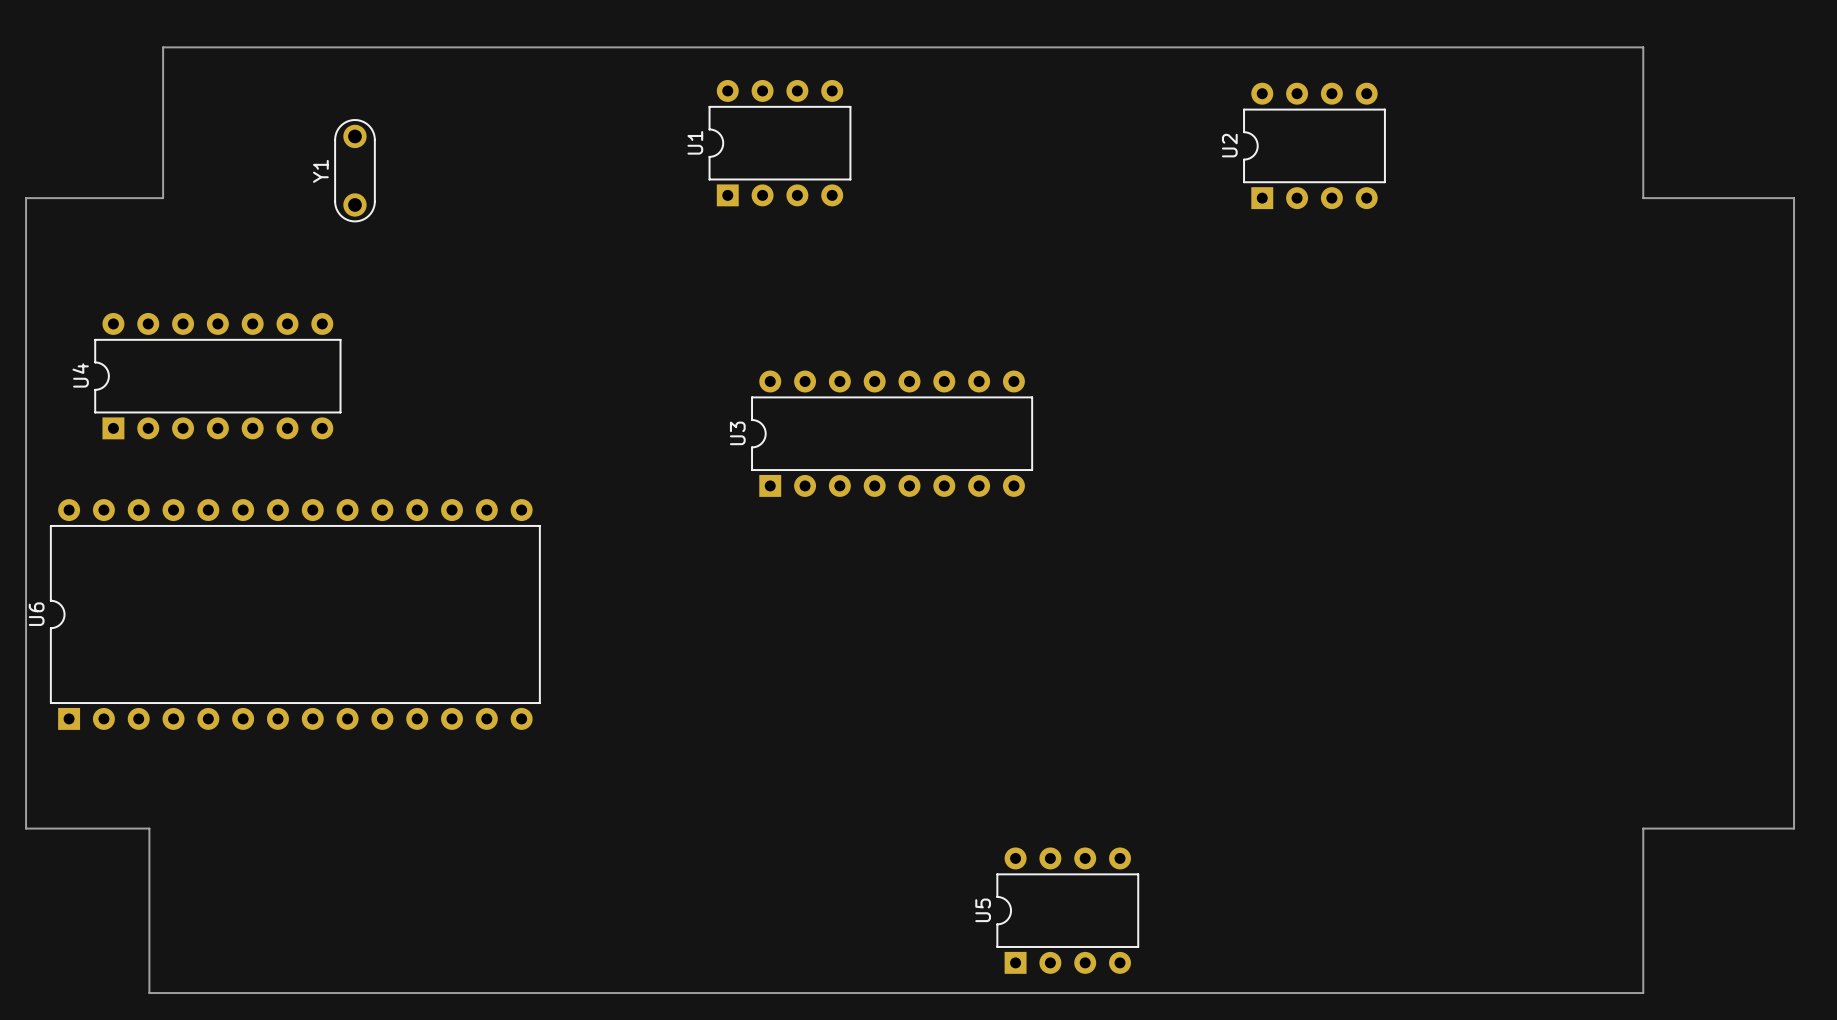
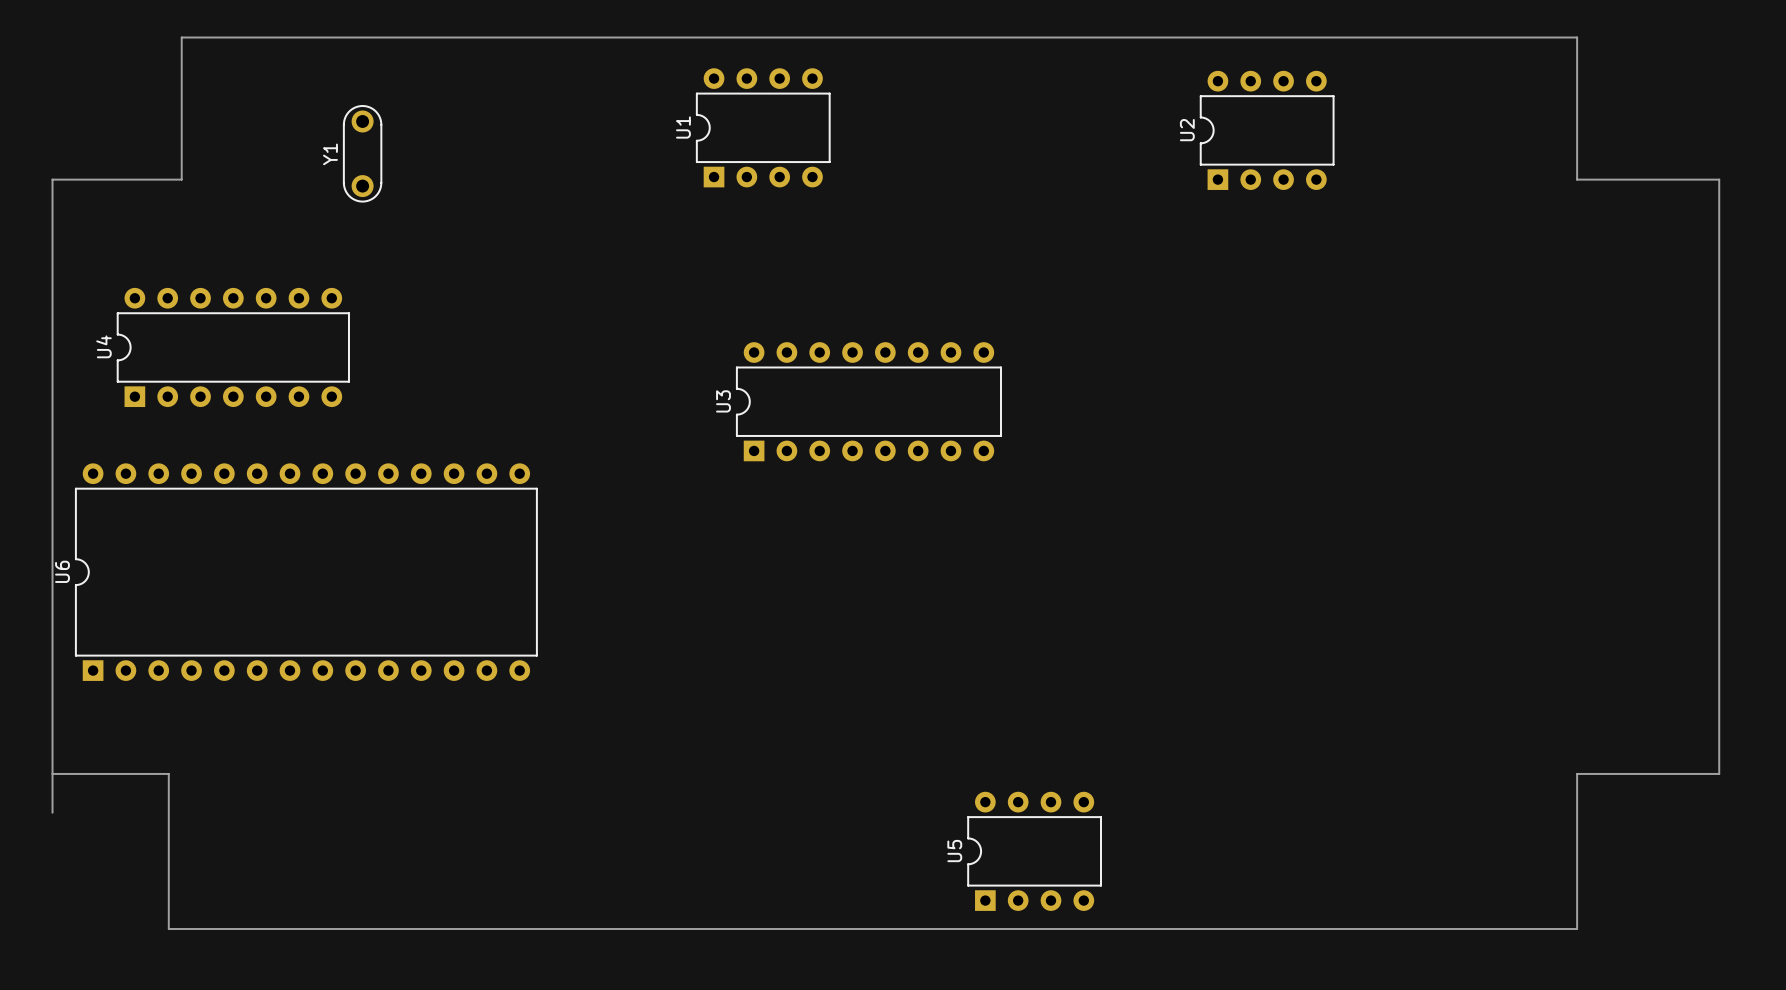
board edge: none -> (52, 773) (52, 812)

